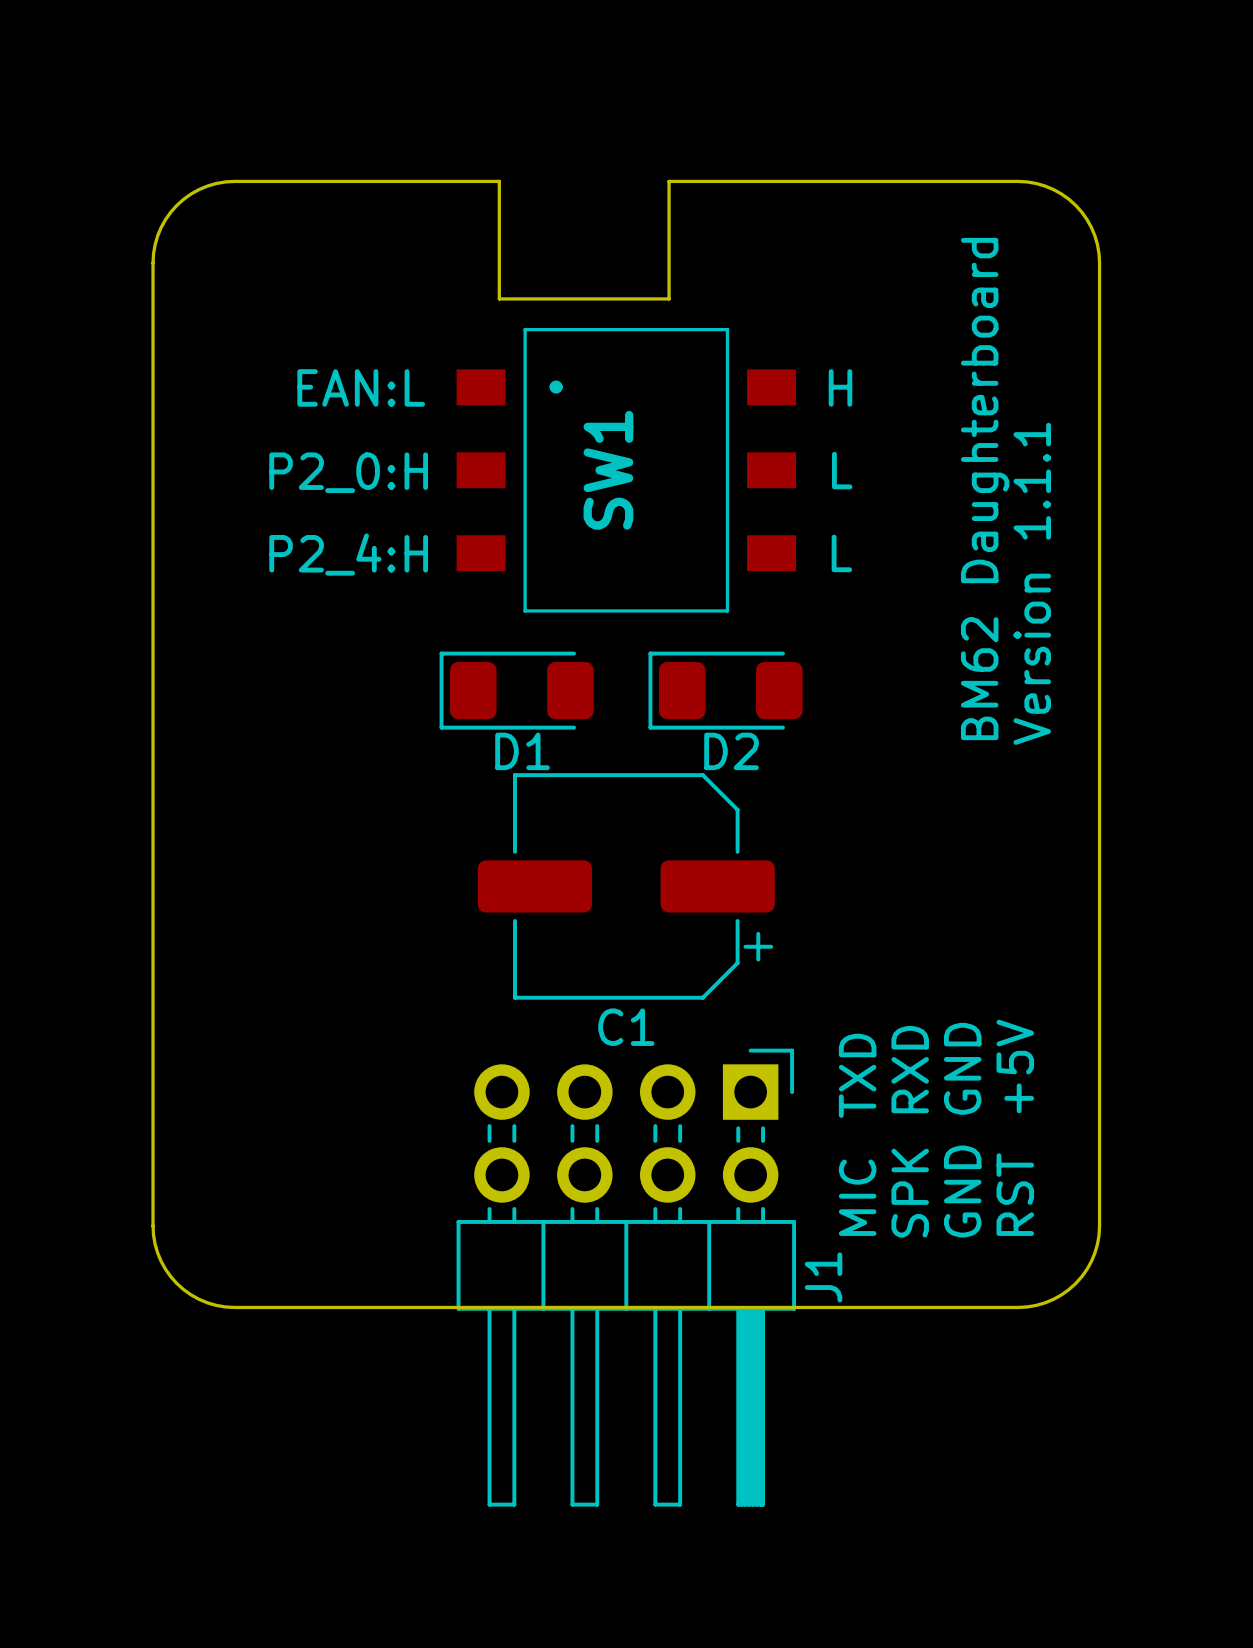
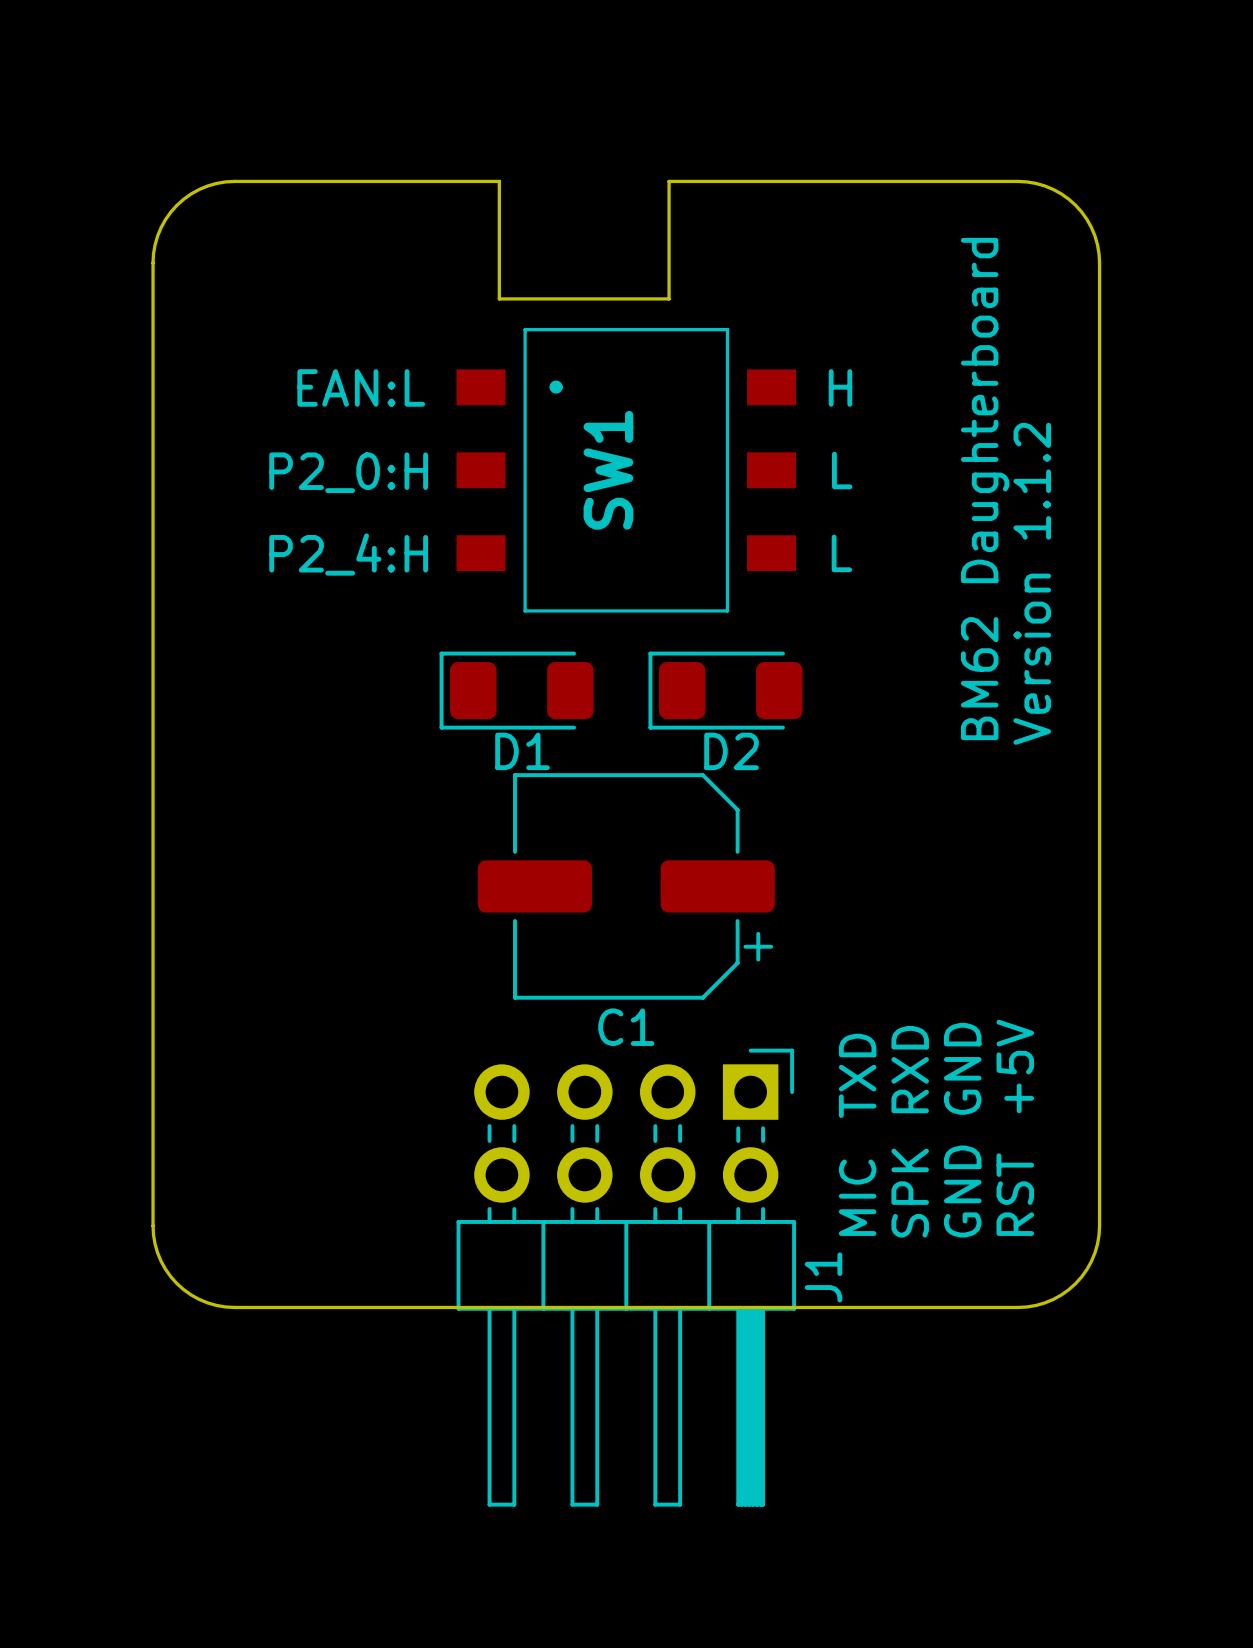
text: Version 1.1.1 (1032, 583) -> Version 1.1.2 (1032, 583)

